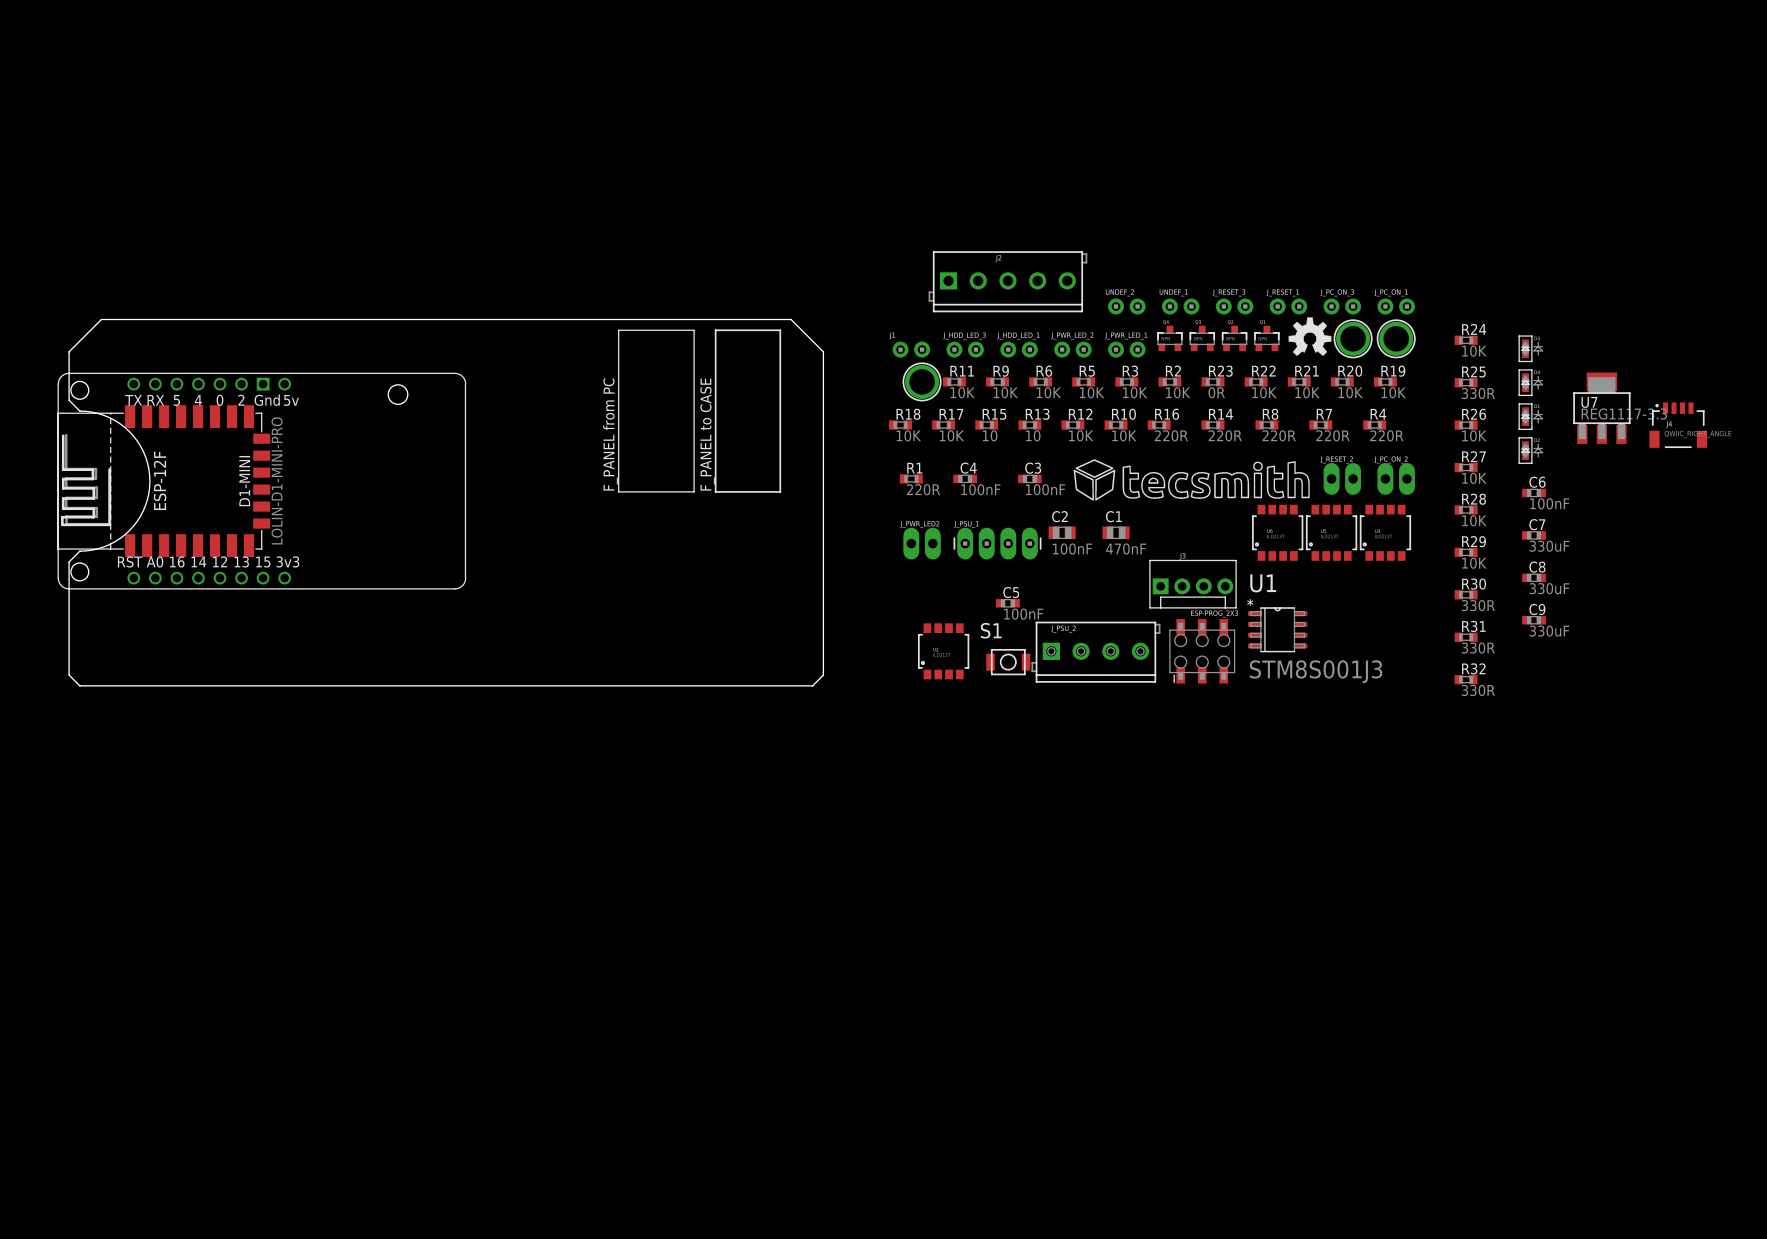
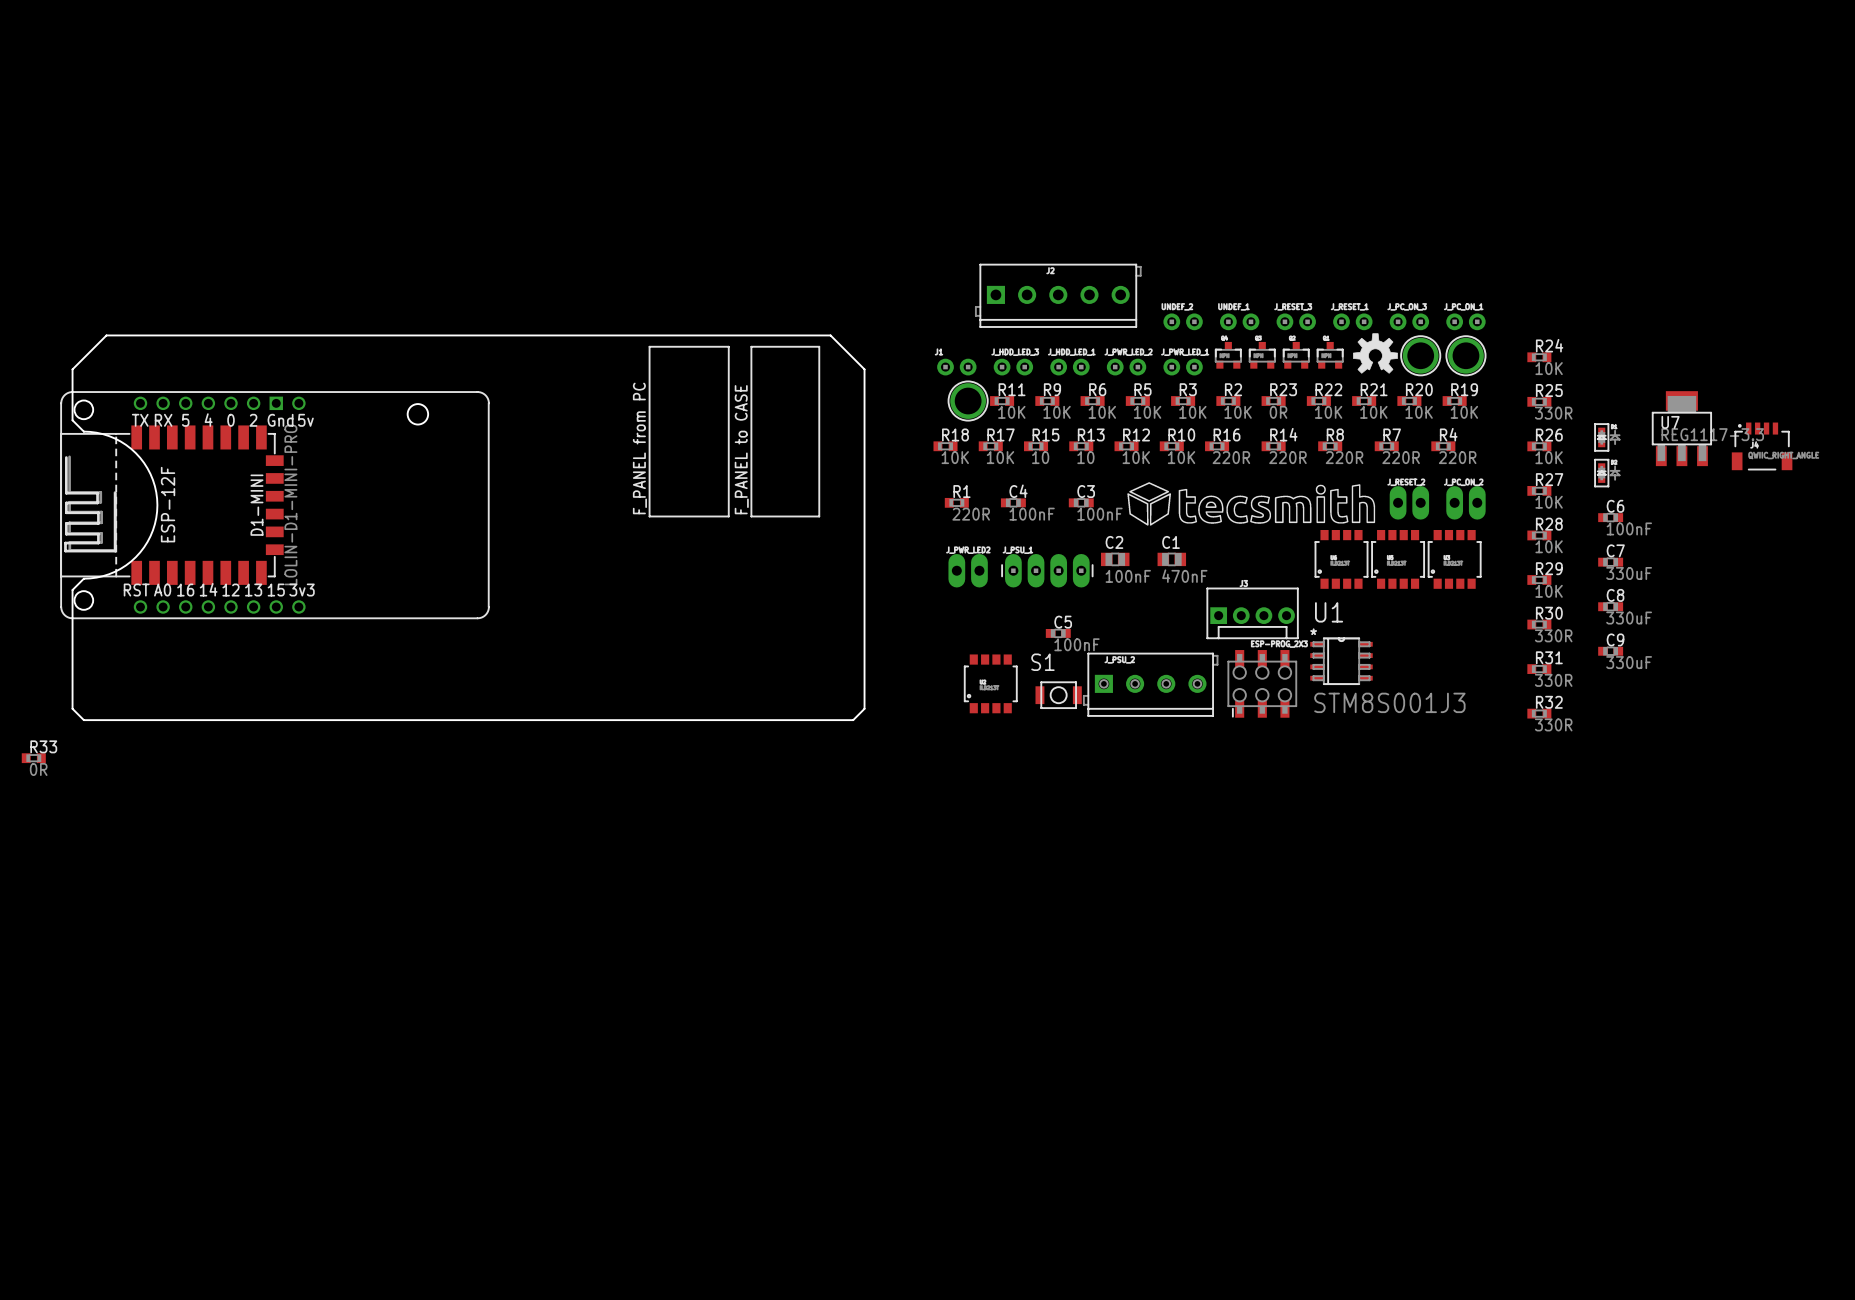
part: (1530, 348) -> none
part: (1530, 382) -> none
R33: none -> 0R (33, 758)

